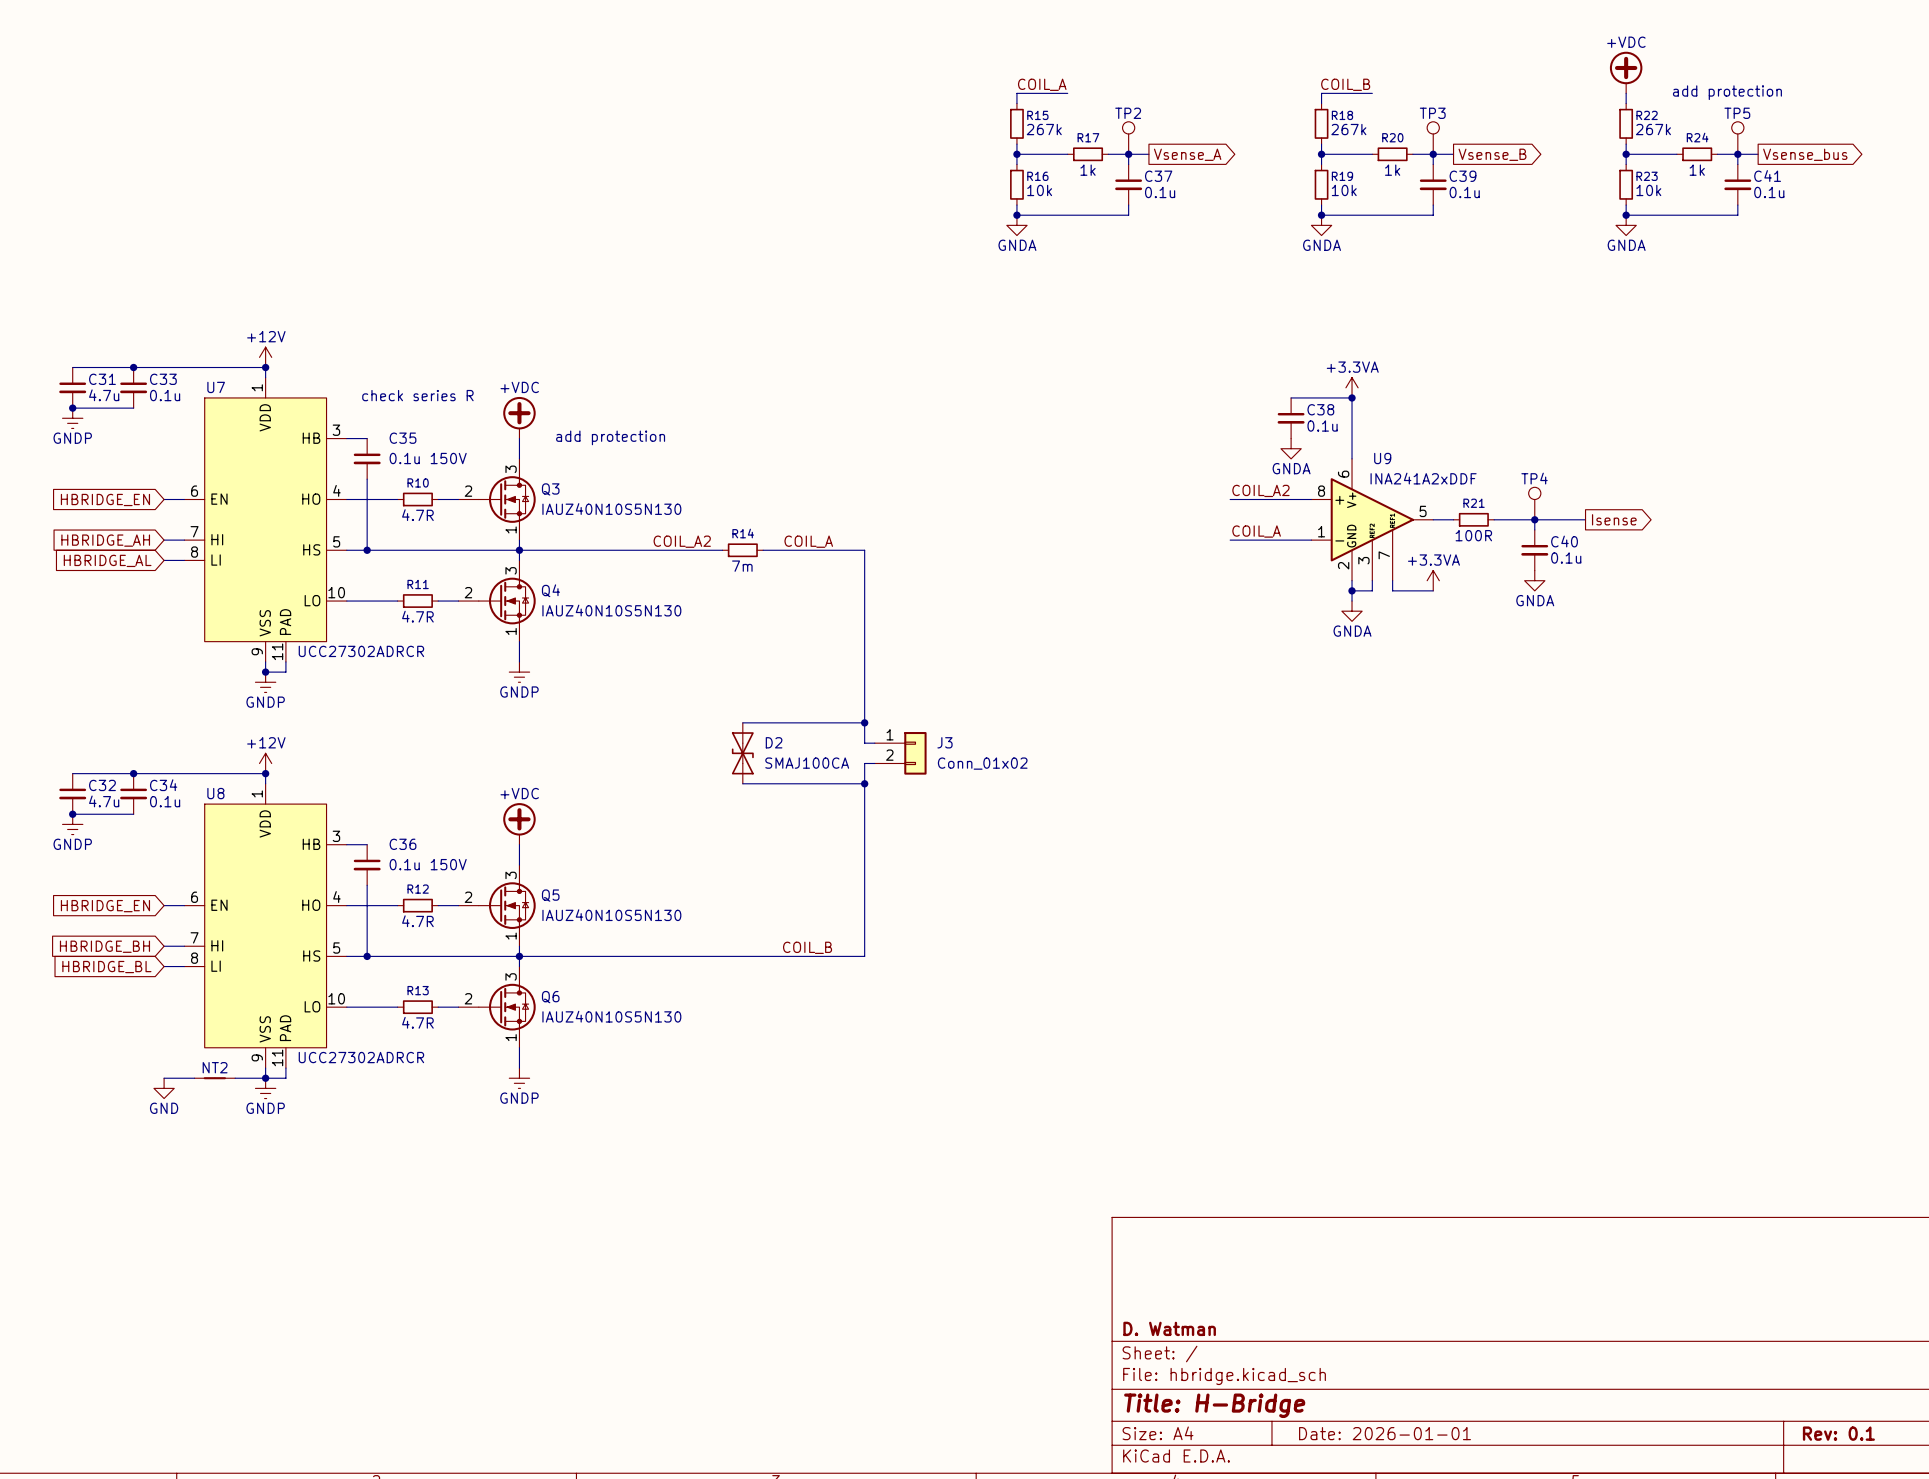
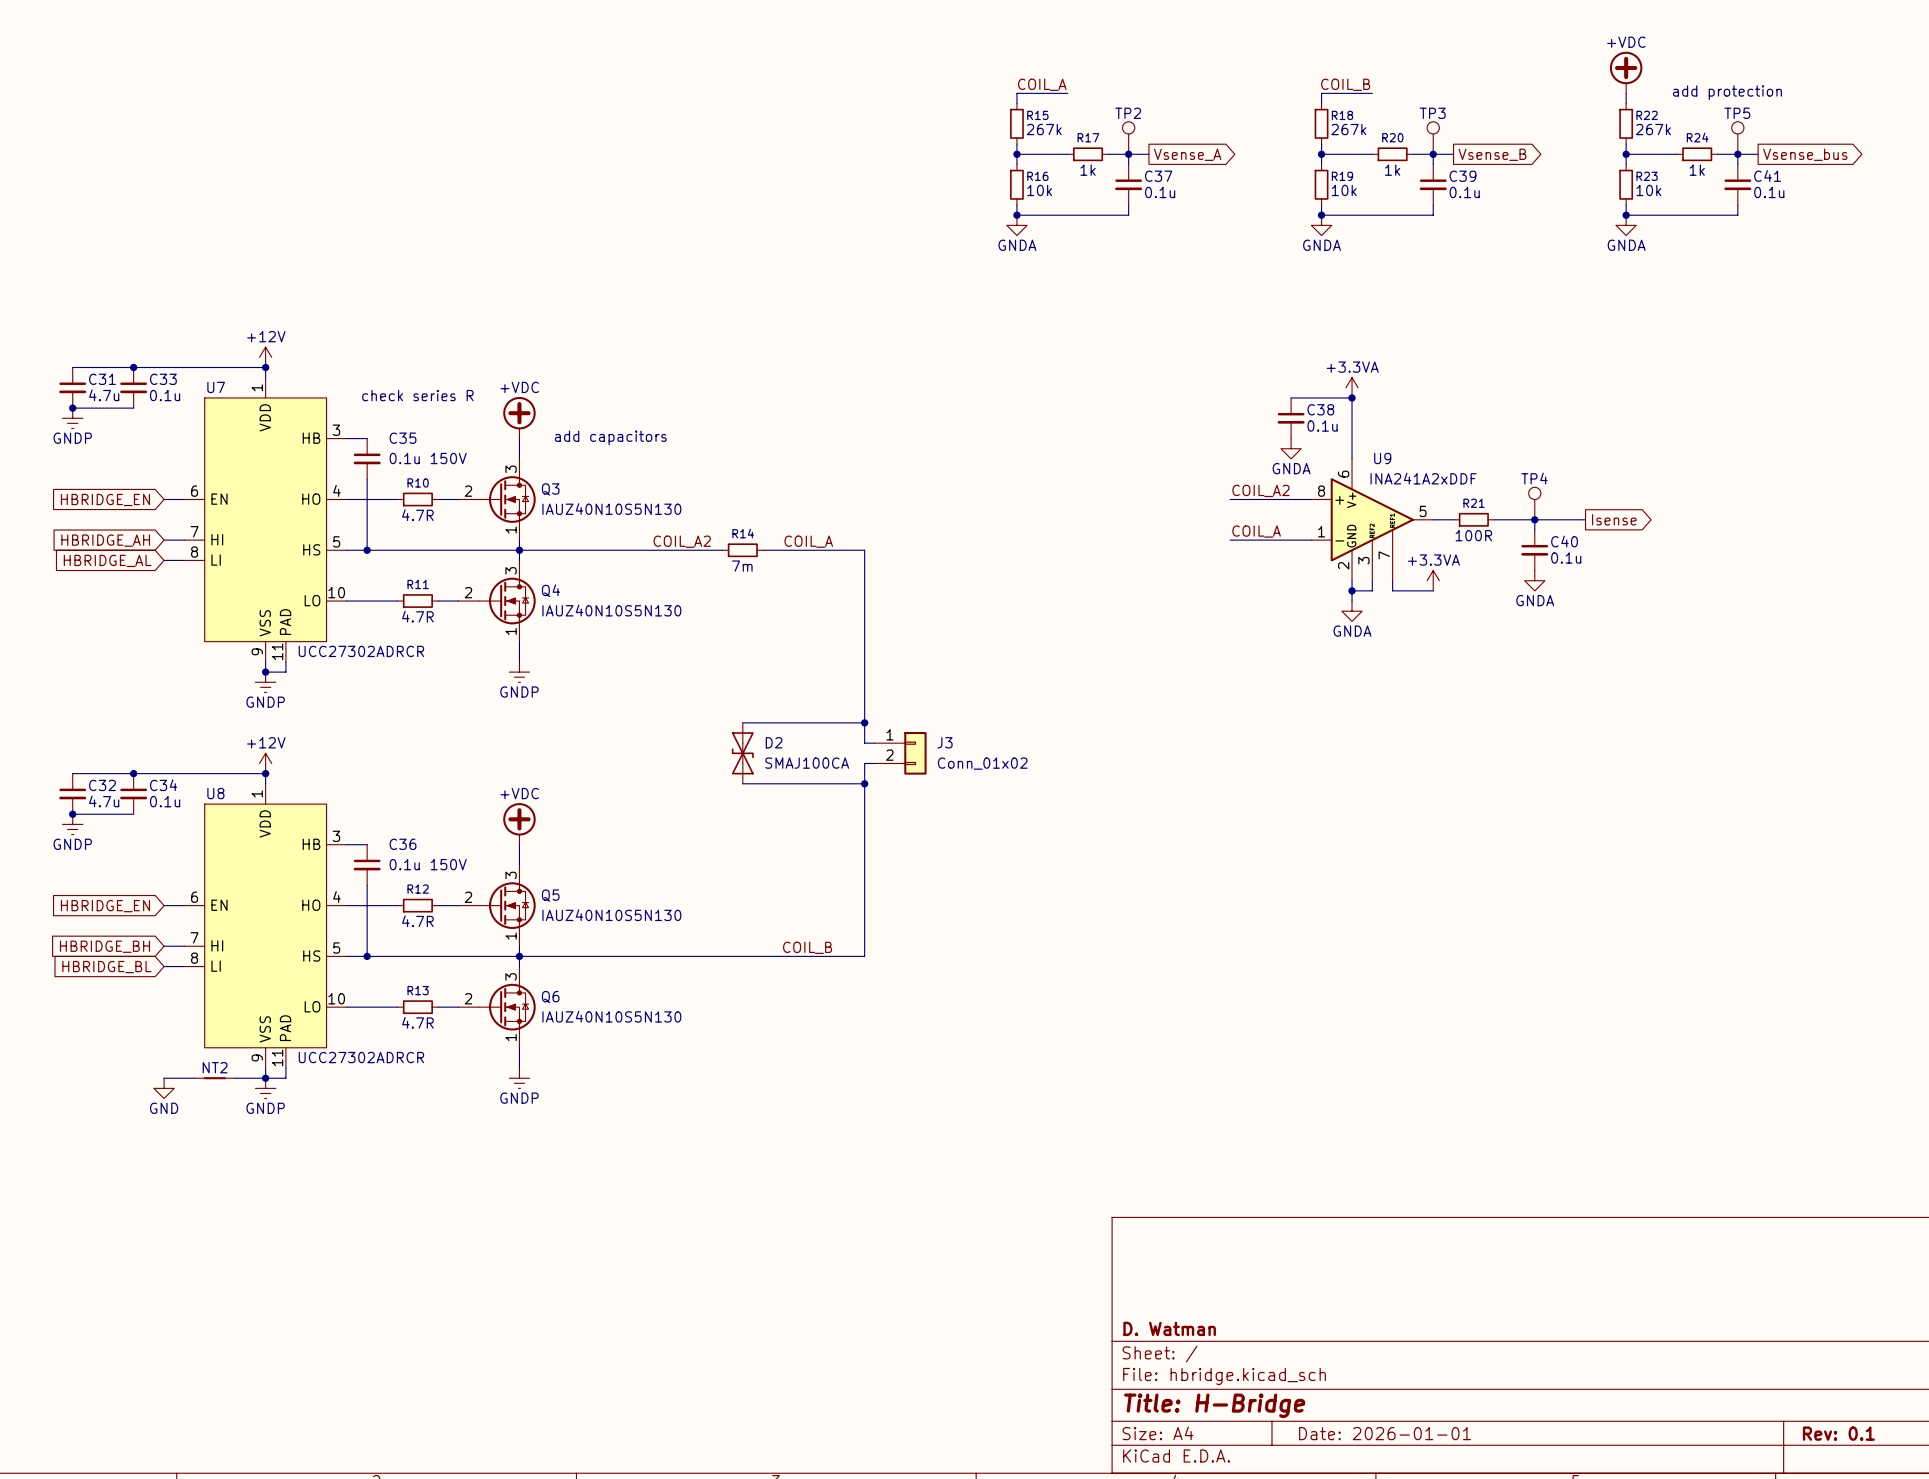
text: add protection (610, 437) -> add capacitors (610, 437)

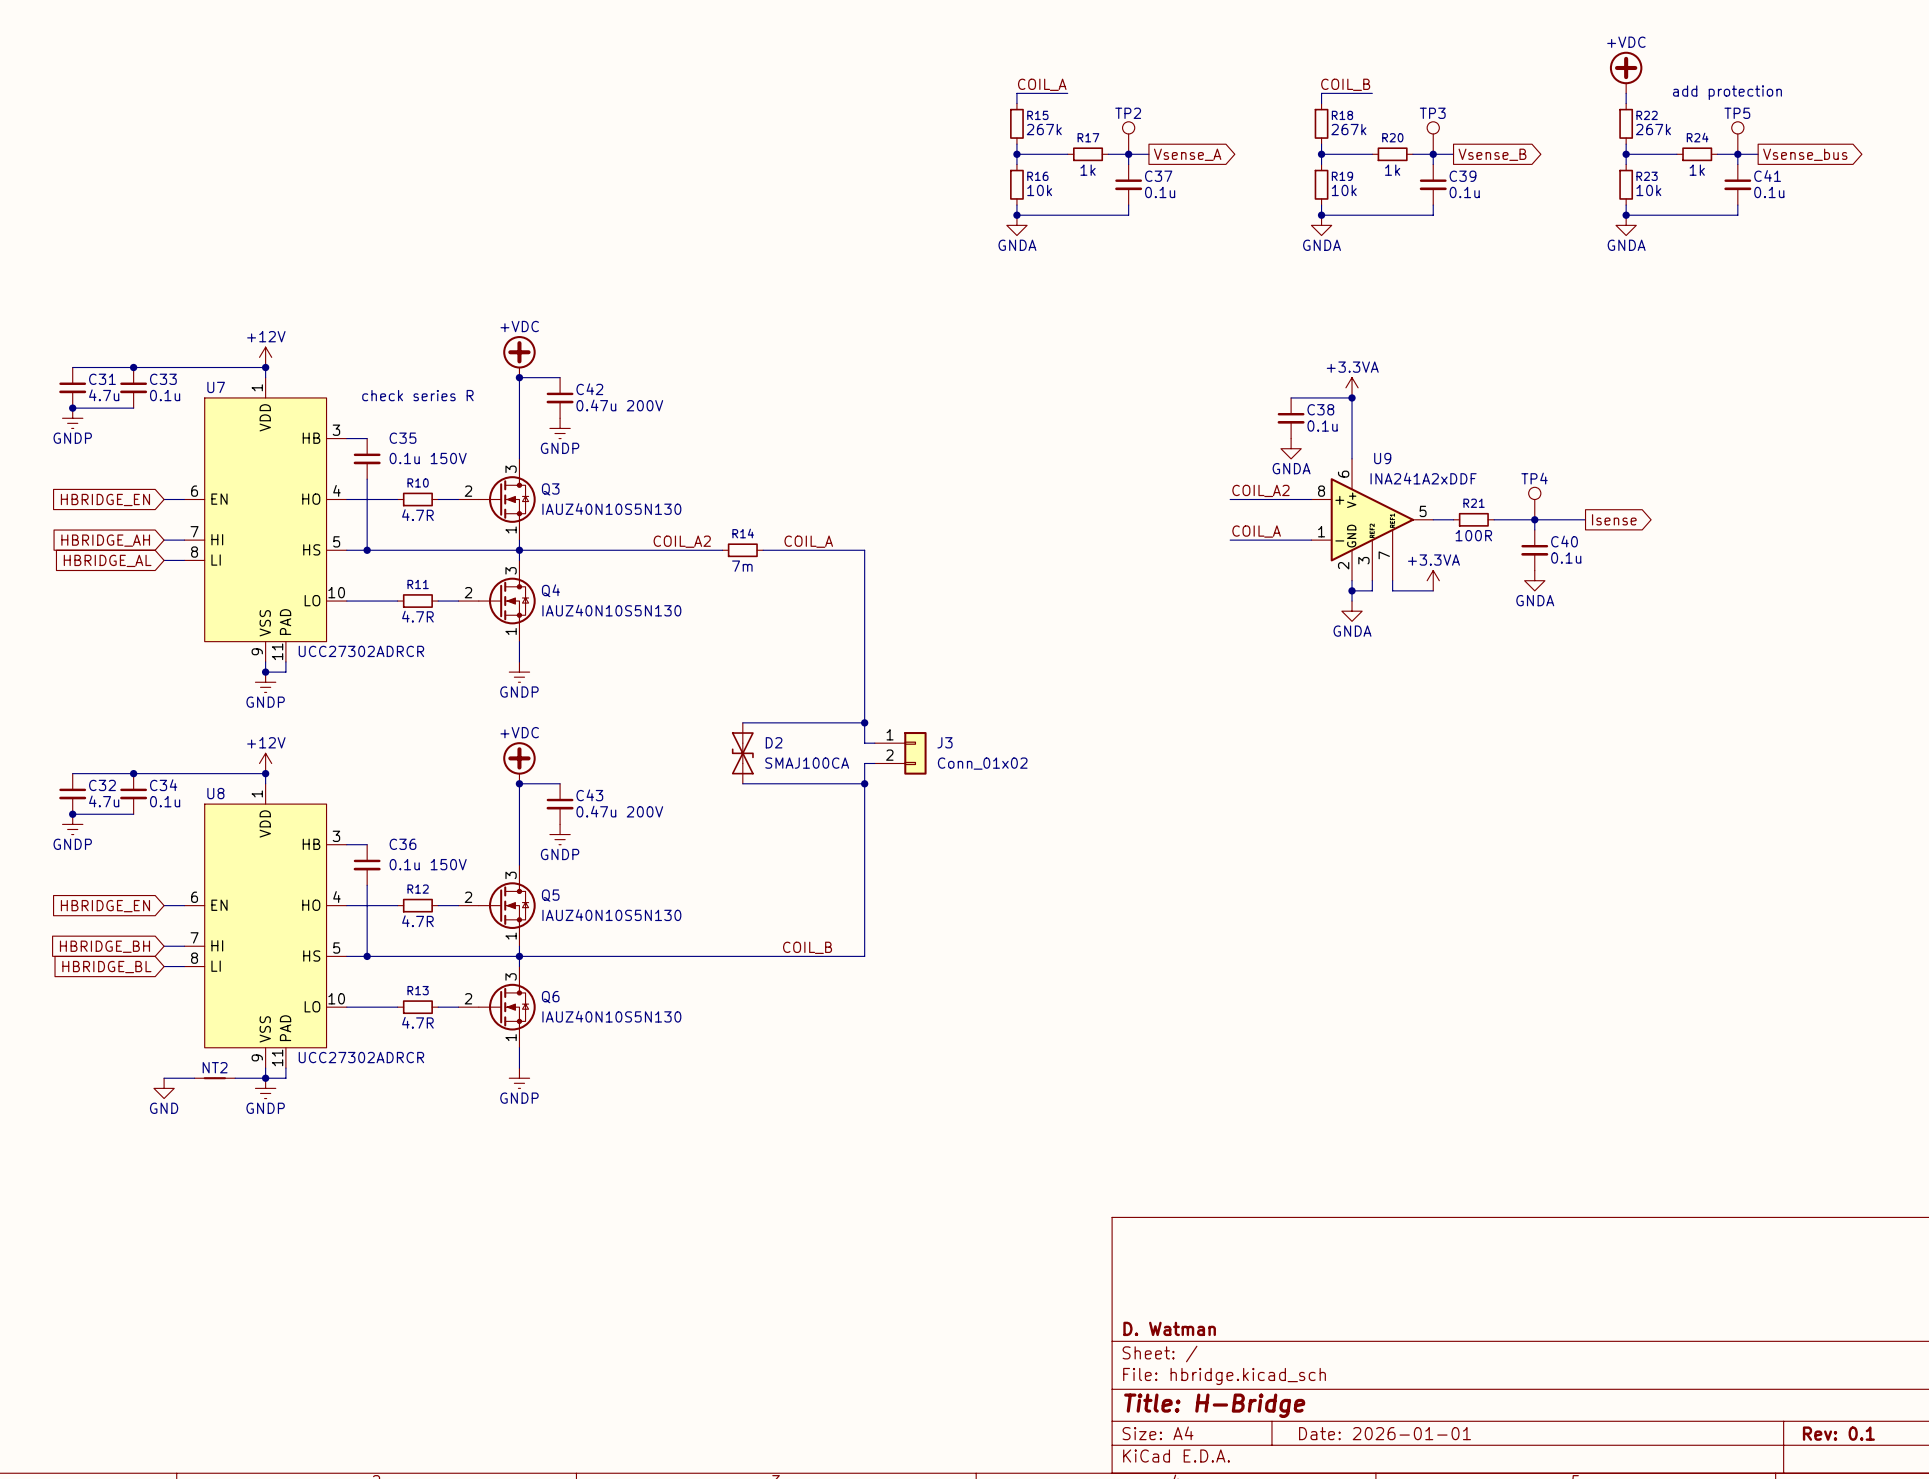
junction: none -> (519, 377)
wire: none -> (560, 377) (519, 377) (519, 438)
C42: none -> 0.47u 200V (560, 397)
power symbol position: +VDC (519, 417) -> +VDC (519, 356)
power symbol: none -> GNDP (560, 428)
text: add capacitors (610, 437) -> none
junction: none -> (519, 783)
wire: none -> (560, 783) (519, 783) (519, 844)
C43: none -> 0.47u 200V (560, 804)
power symbol position: +VDC (519, 823) -> +VDC (519, 762)
power symbol: none -> GNDP (560, 834)

